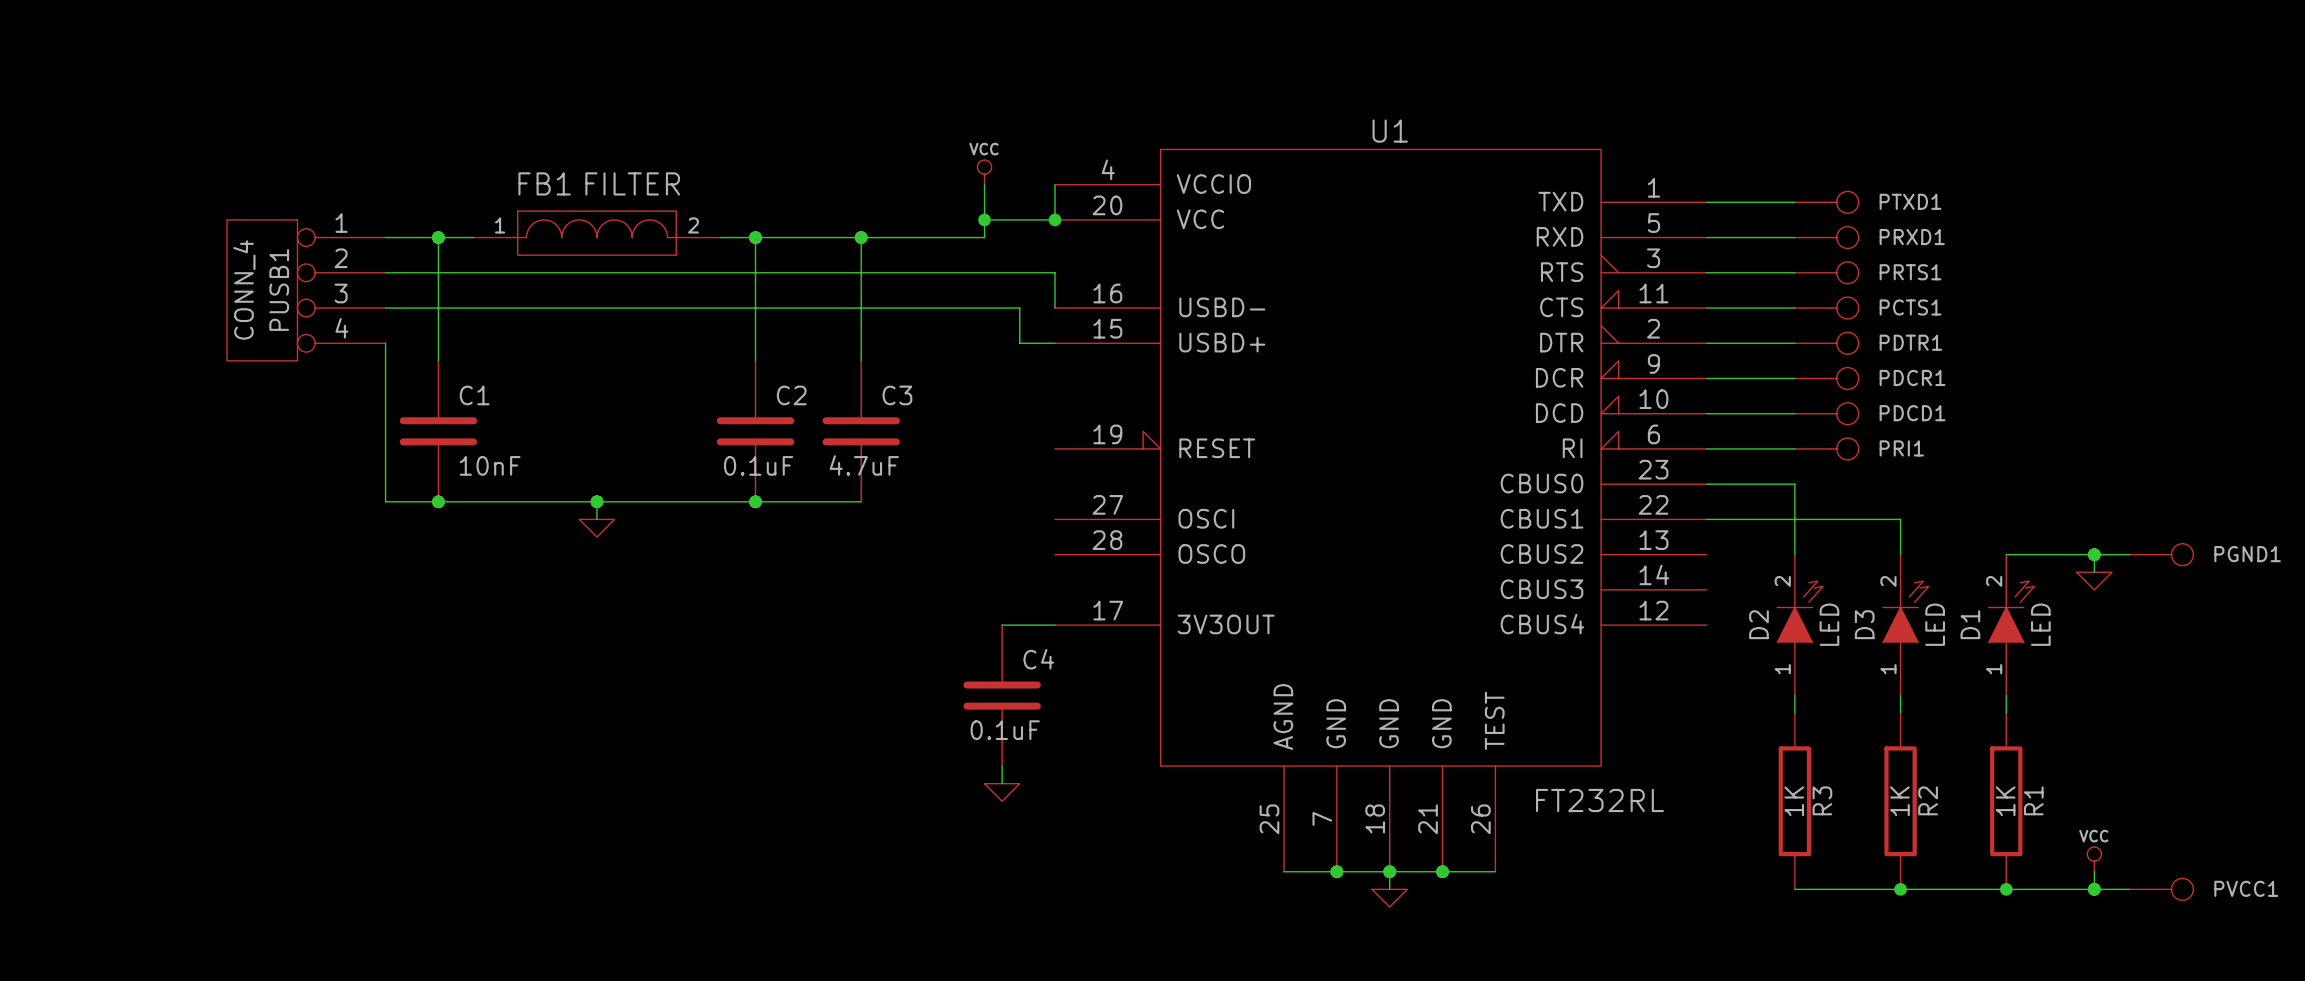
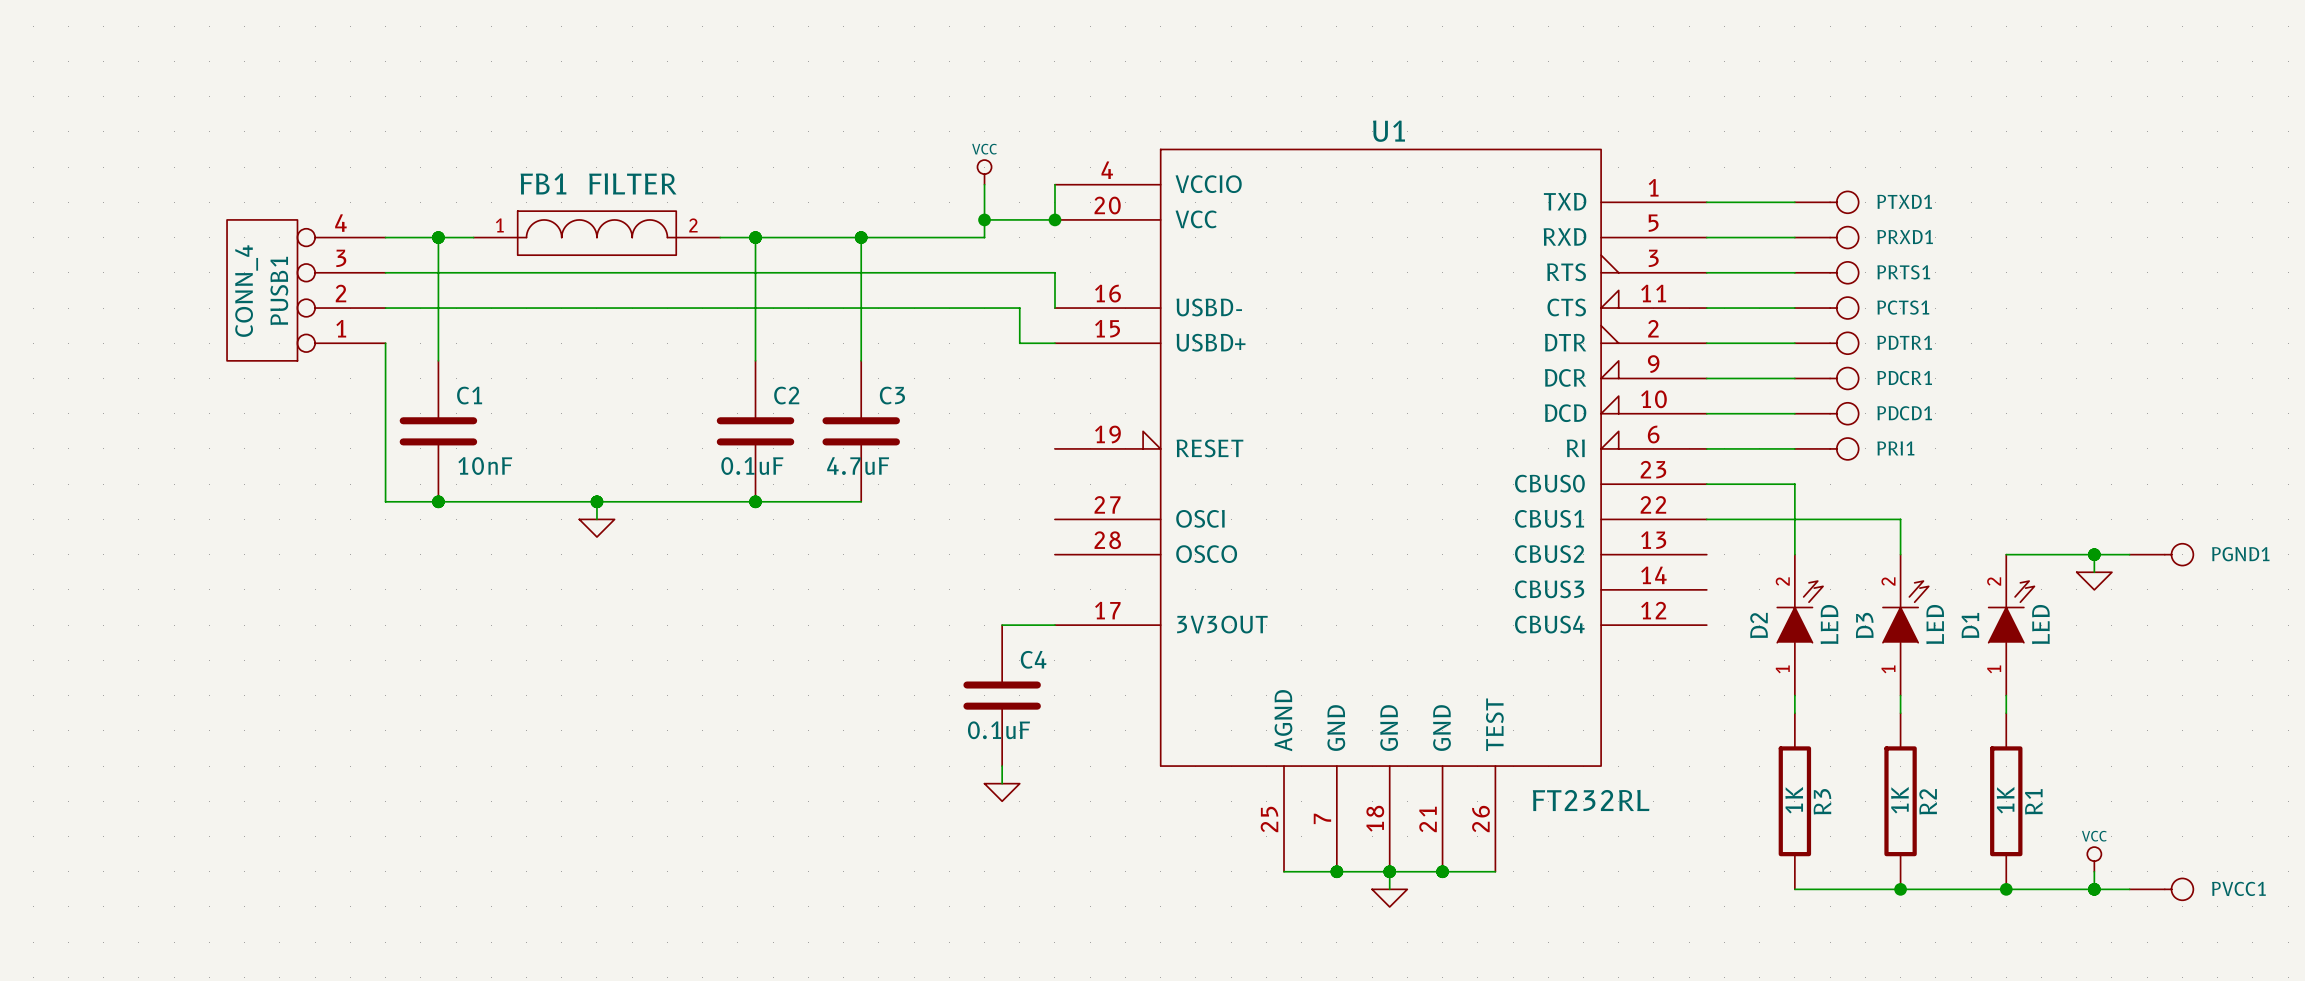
PUSB1 flip: as is (262, 290) -> up-down (262, 290)

